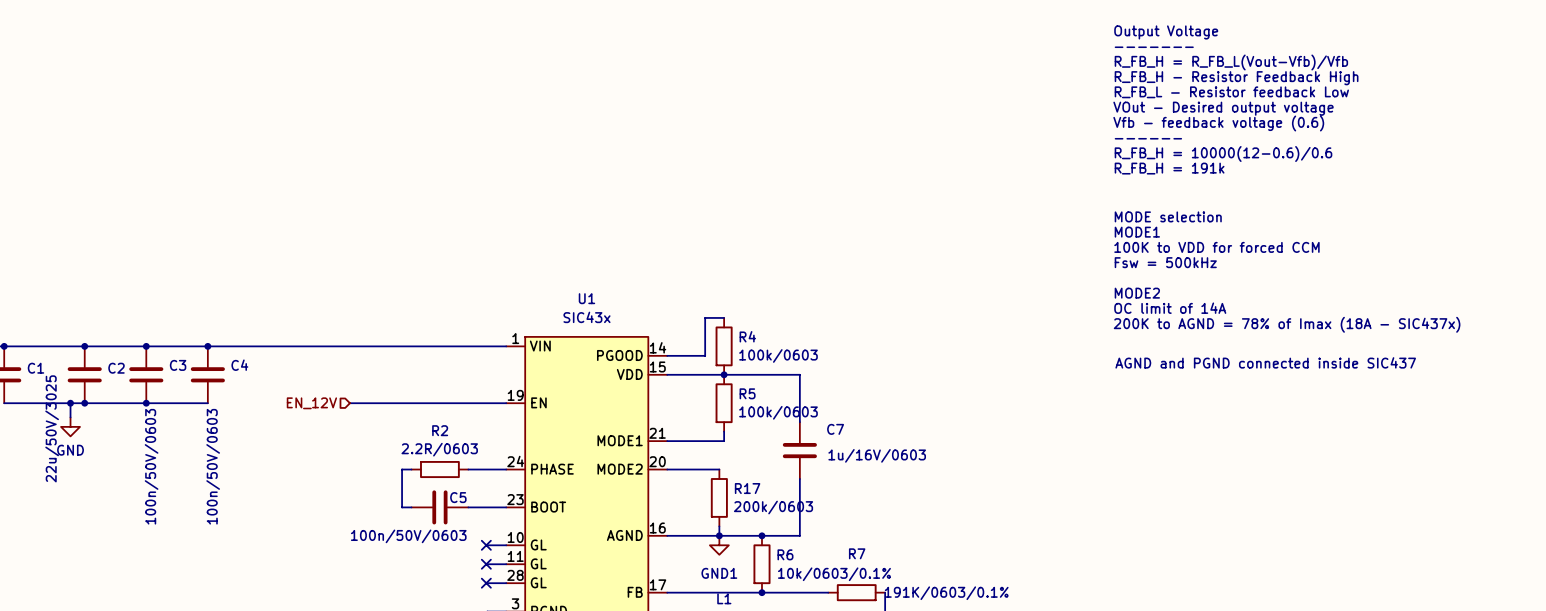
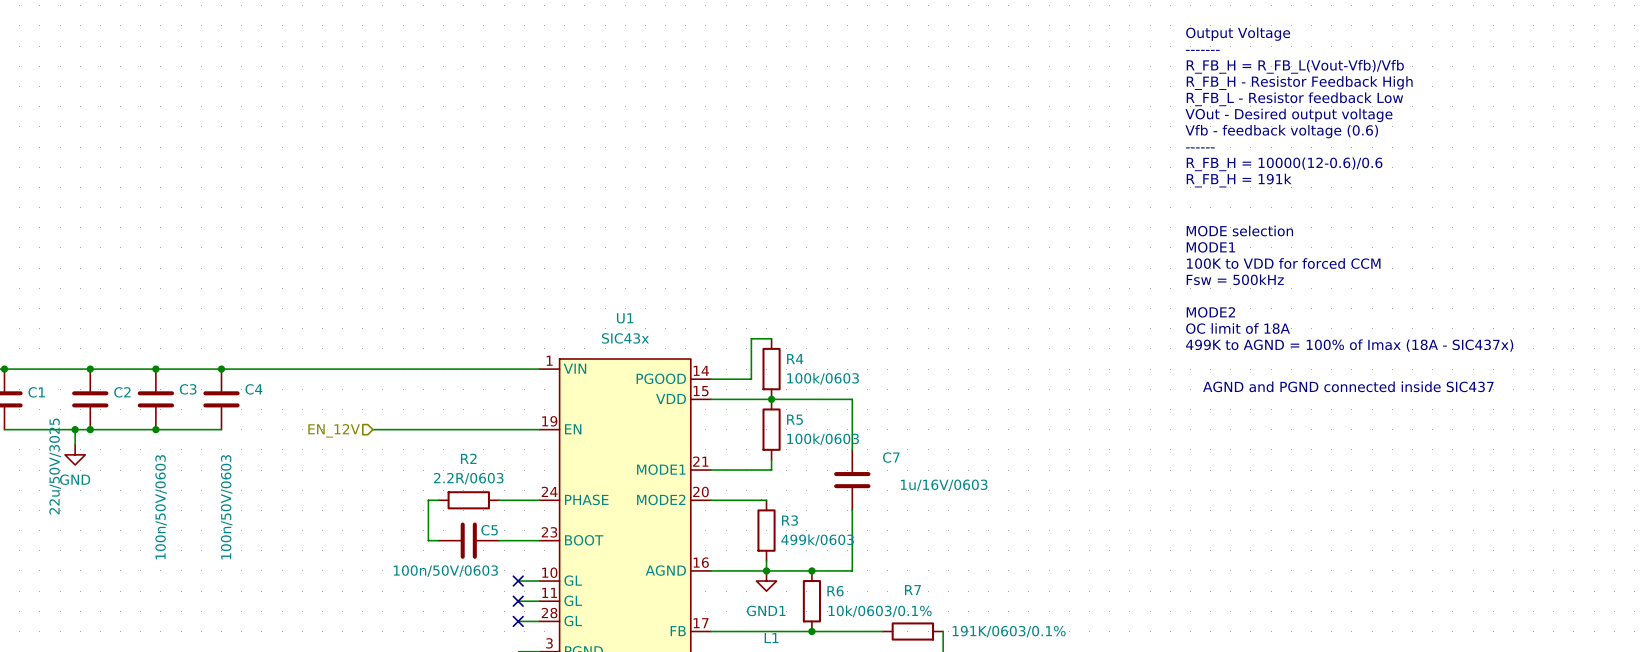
text: OC limit of 14A (1170, 308) -> OC limit of 18A (1238, 328)
text: 200K to AGND = 78% of Imax (18A - SIC437x) (1287, 324) -> 499K to AGND = 100% of Imax (18A - SIC437x) (1349, 345)
R17 name: R17 (747, 488) -> R3 (789, 520)
R17 value: 200k/0603 (773, 507) -> 499k/0603 (817, 540)

